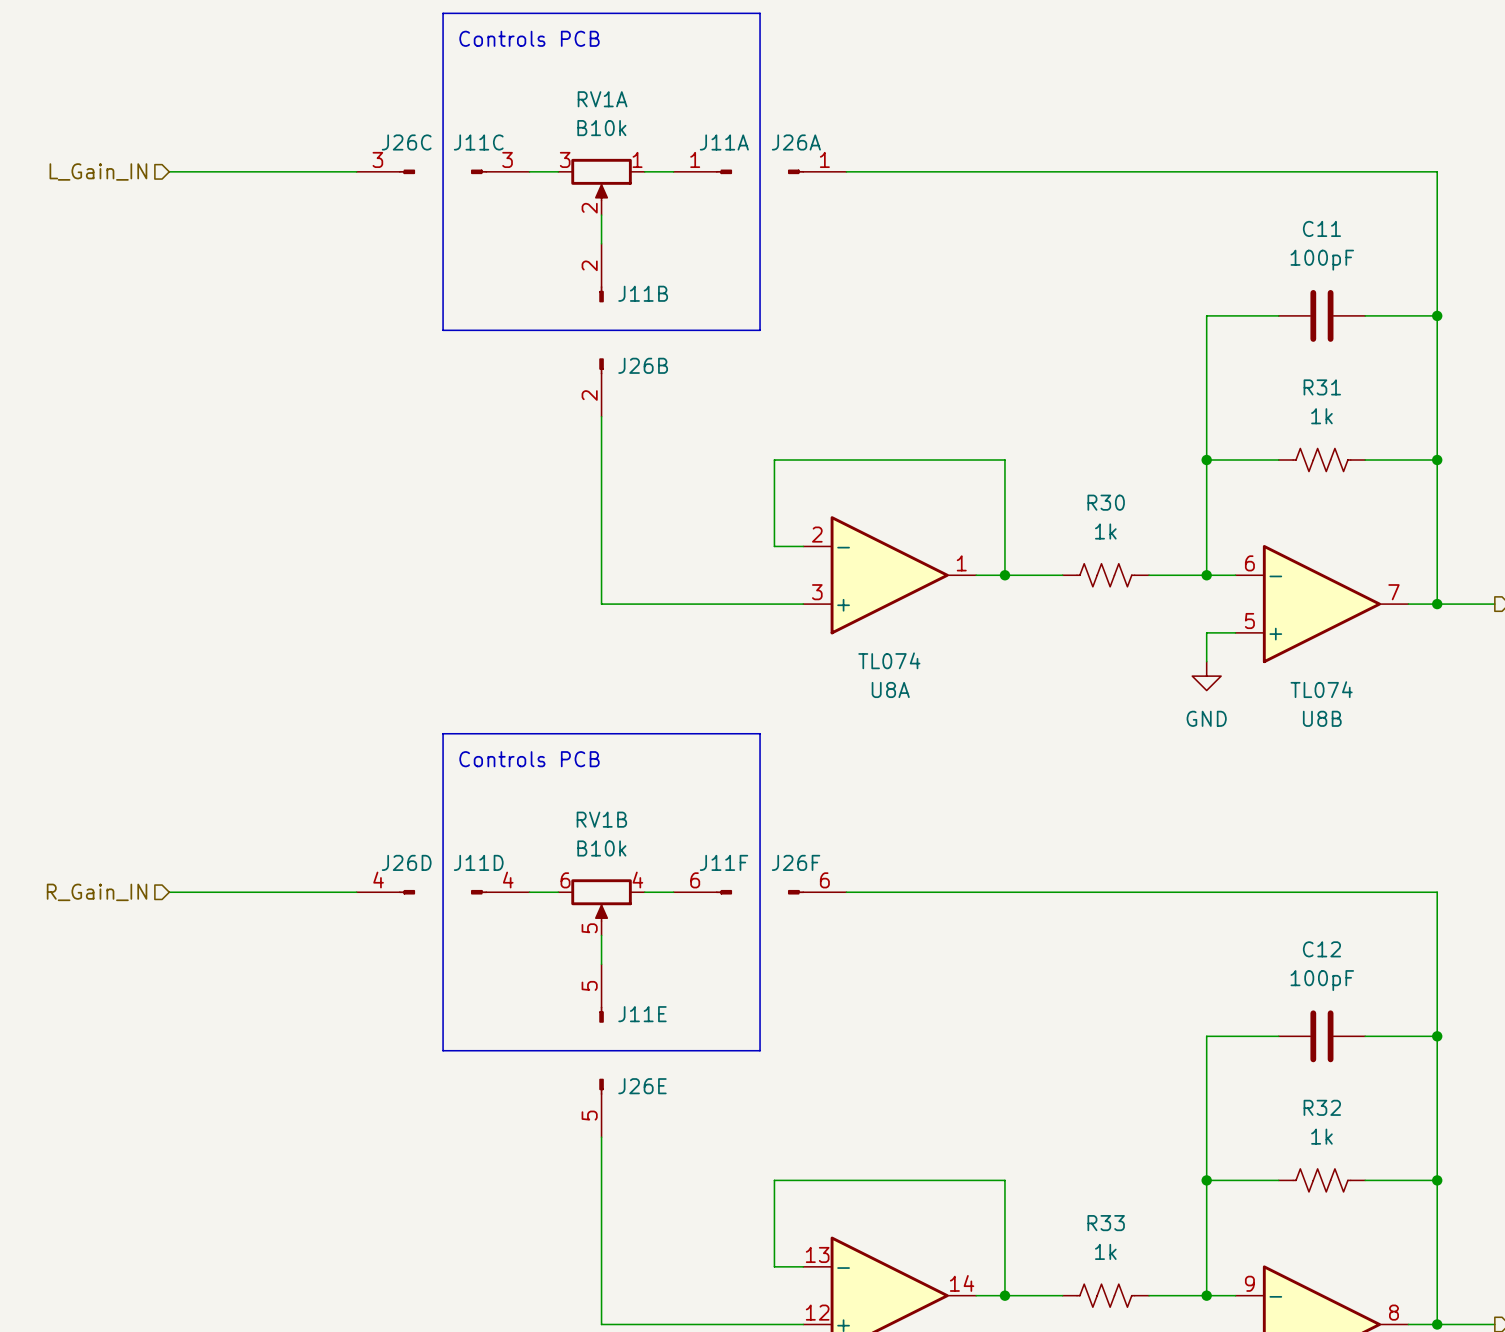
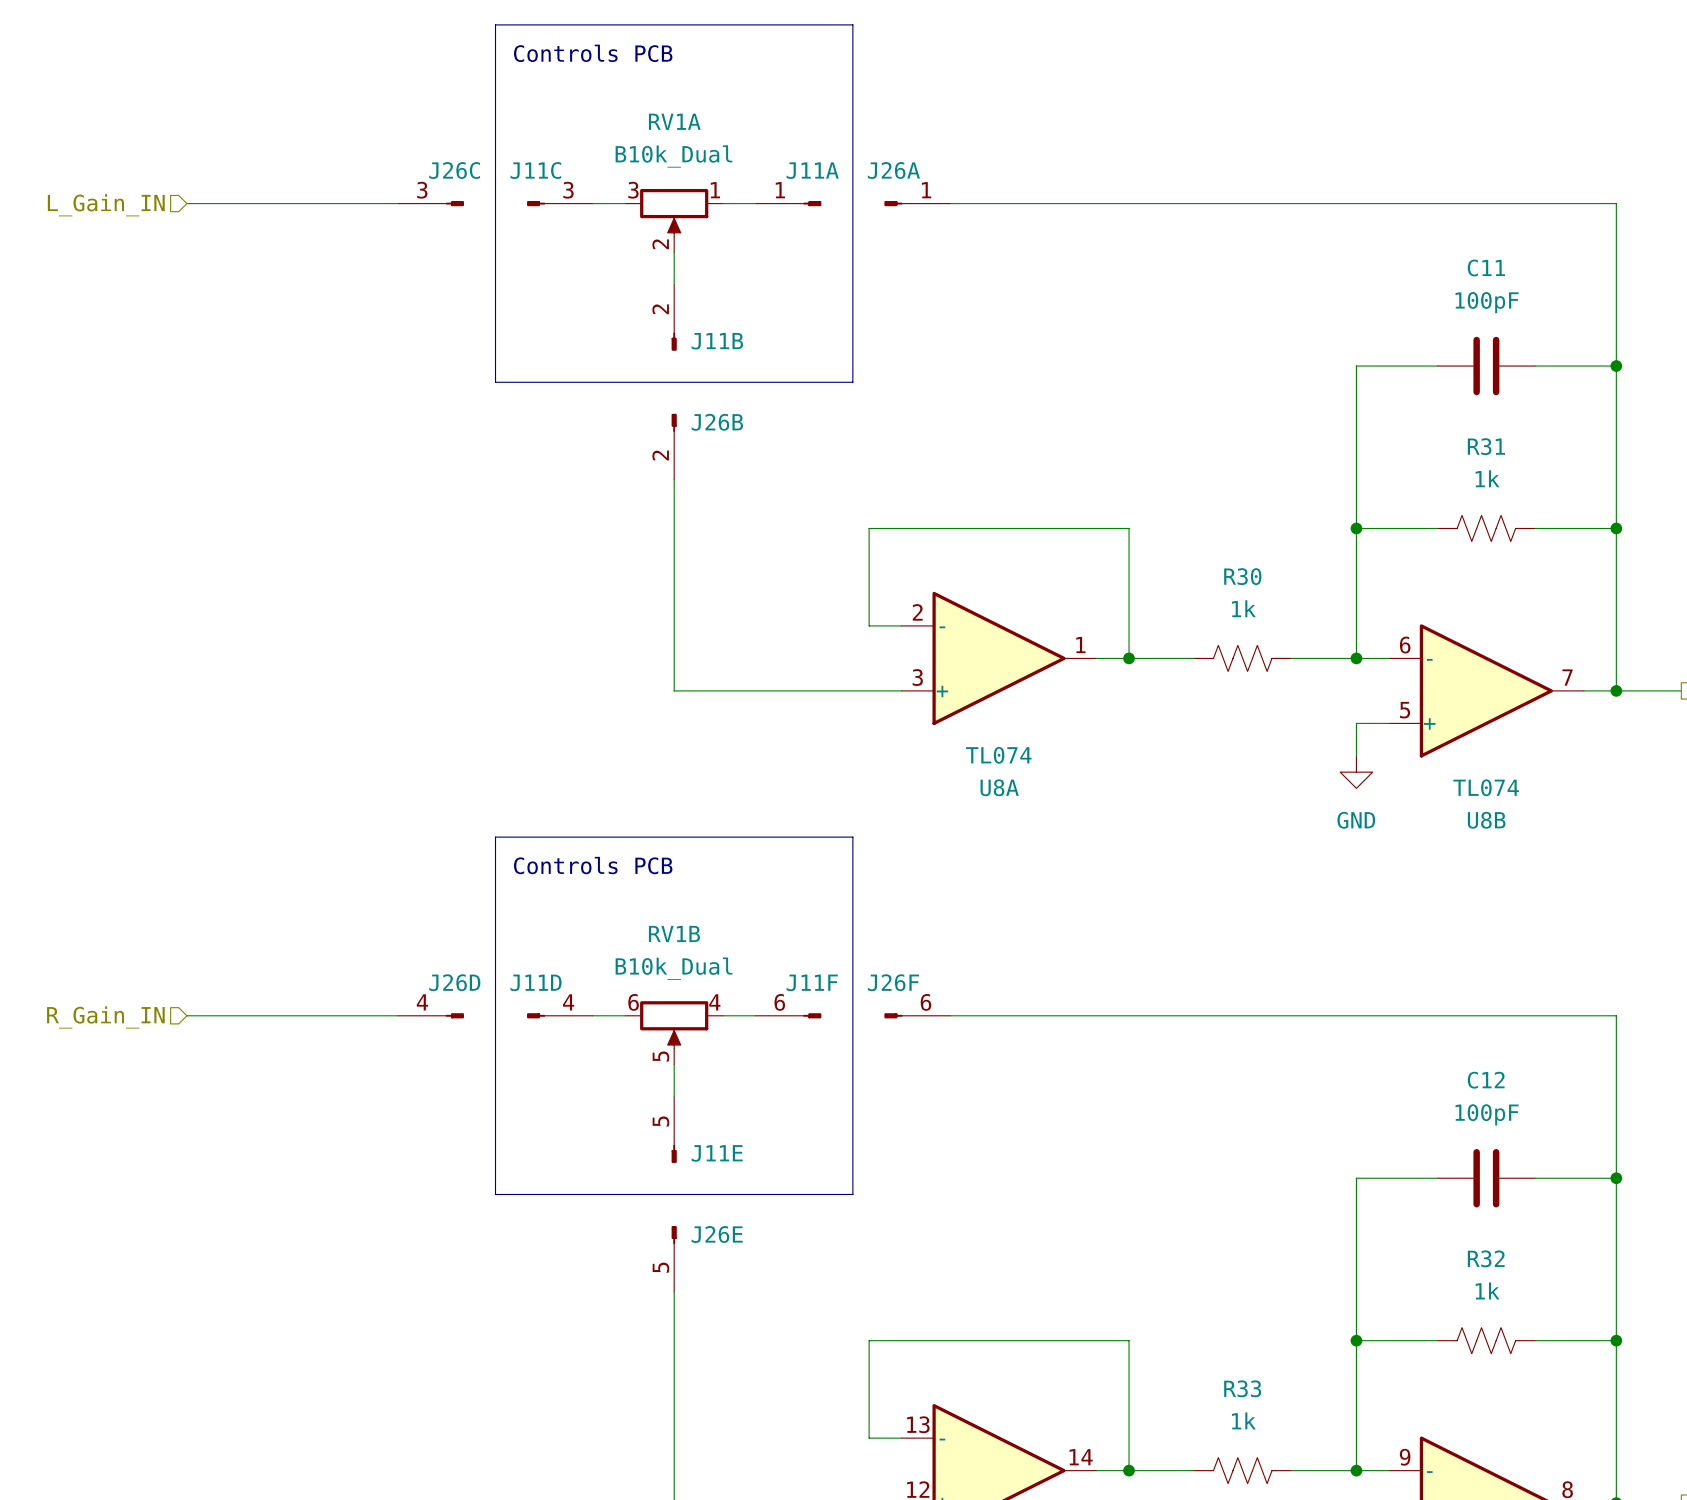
RV1A value: B10k (601, 128) -> B10k_Dual (674, 156)
RV1B value: B10k (601, 848) -> B10k_Dual (674, 968)

